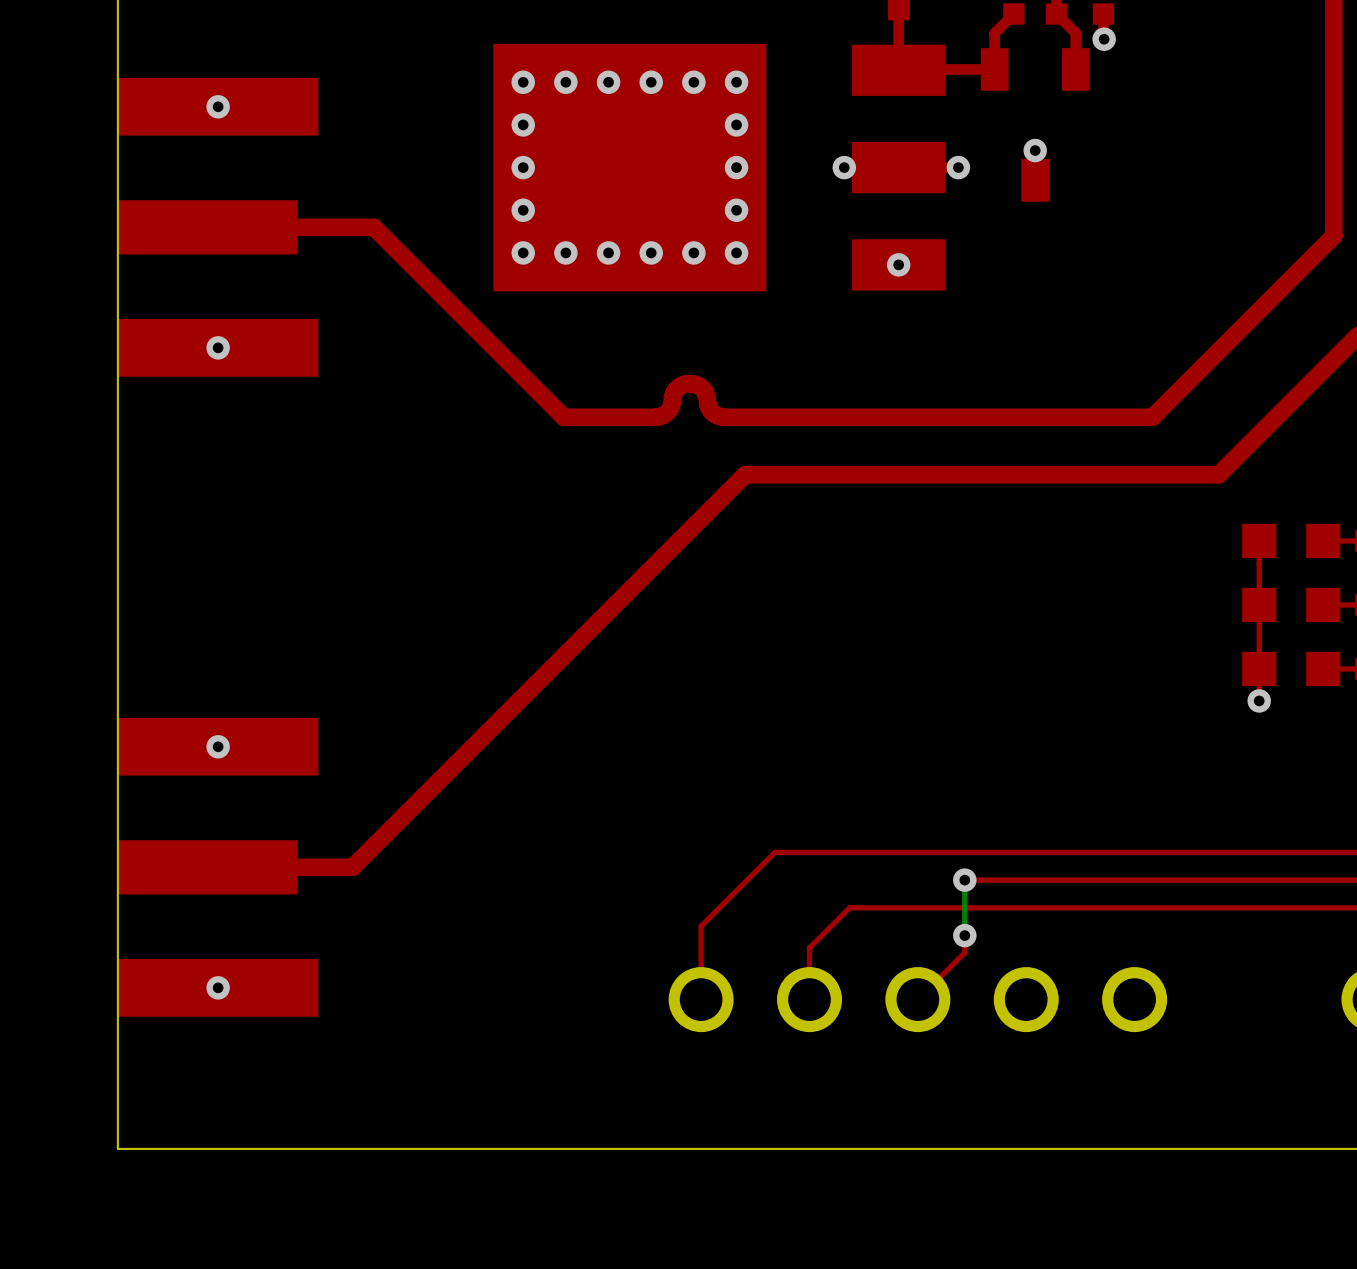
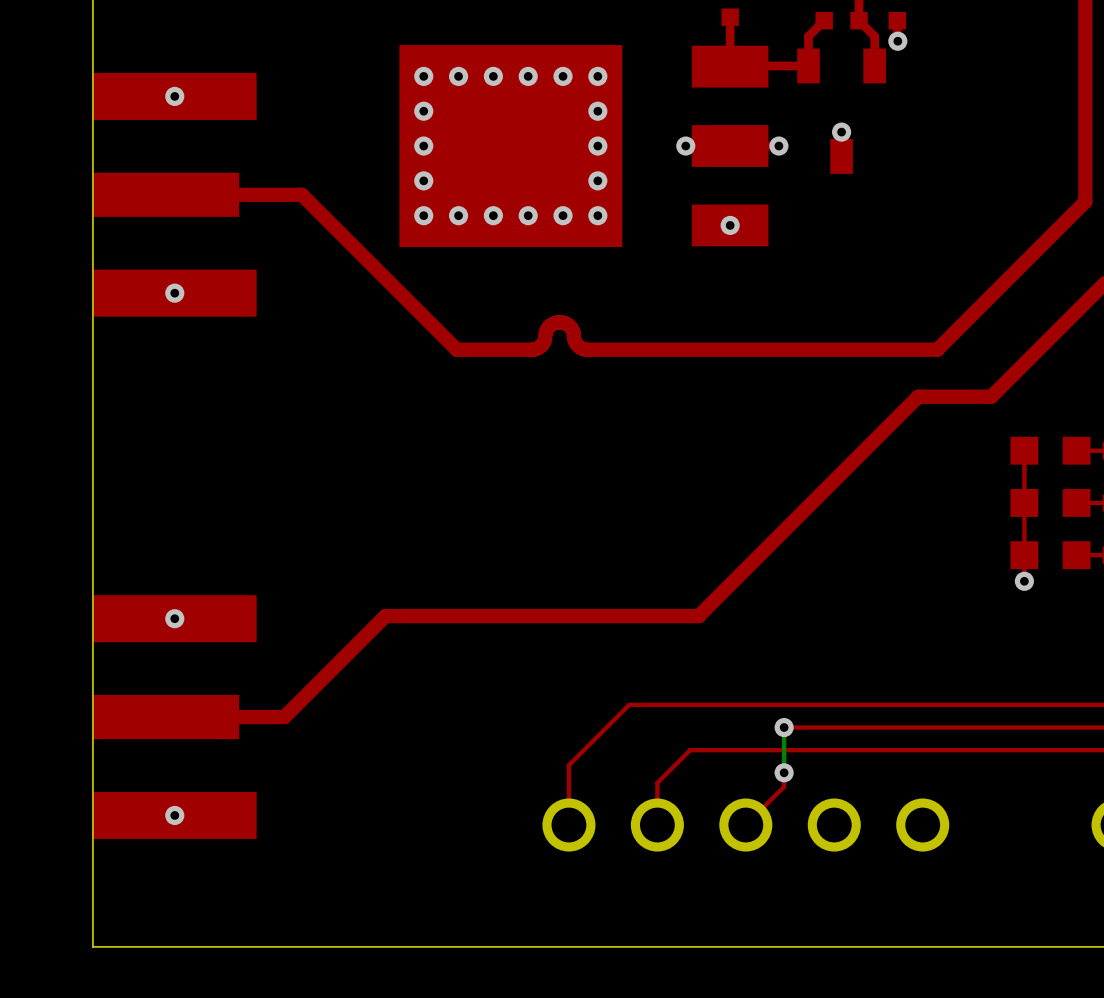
top track: (1129, 474) (745, 474) (476, 743) -> (918, 396) (698, 616) (385, 616)

